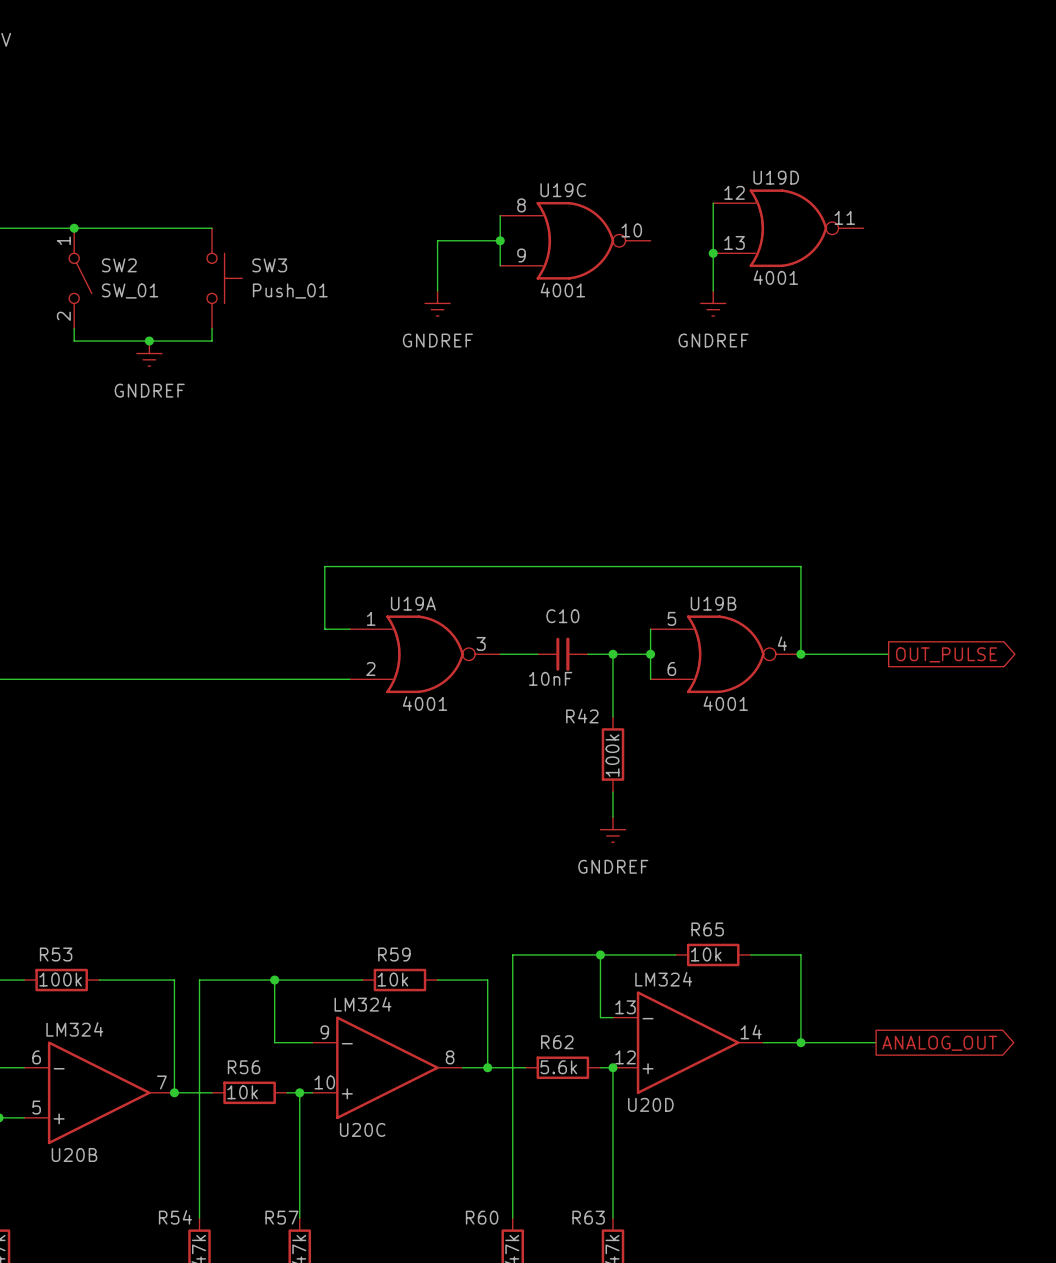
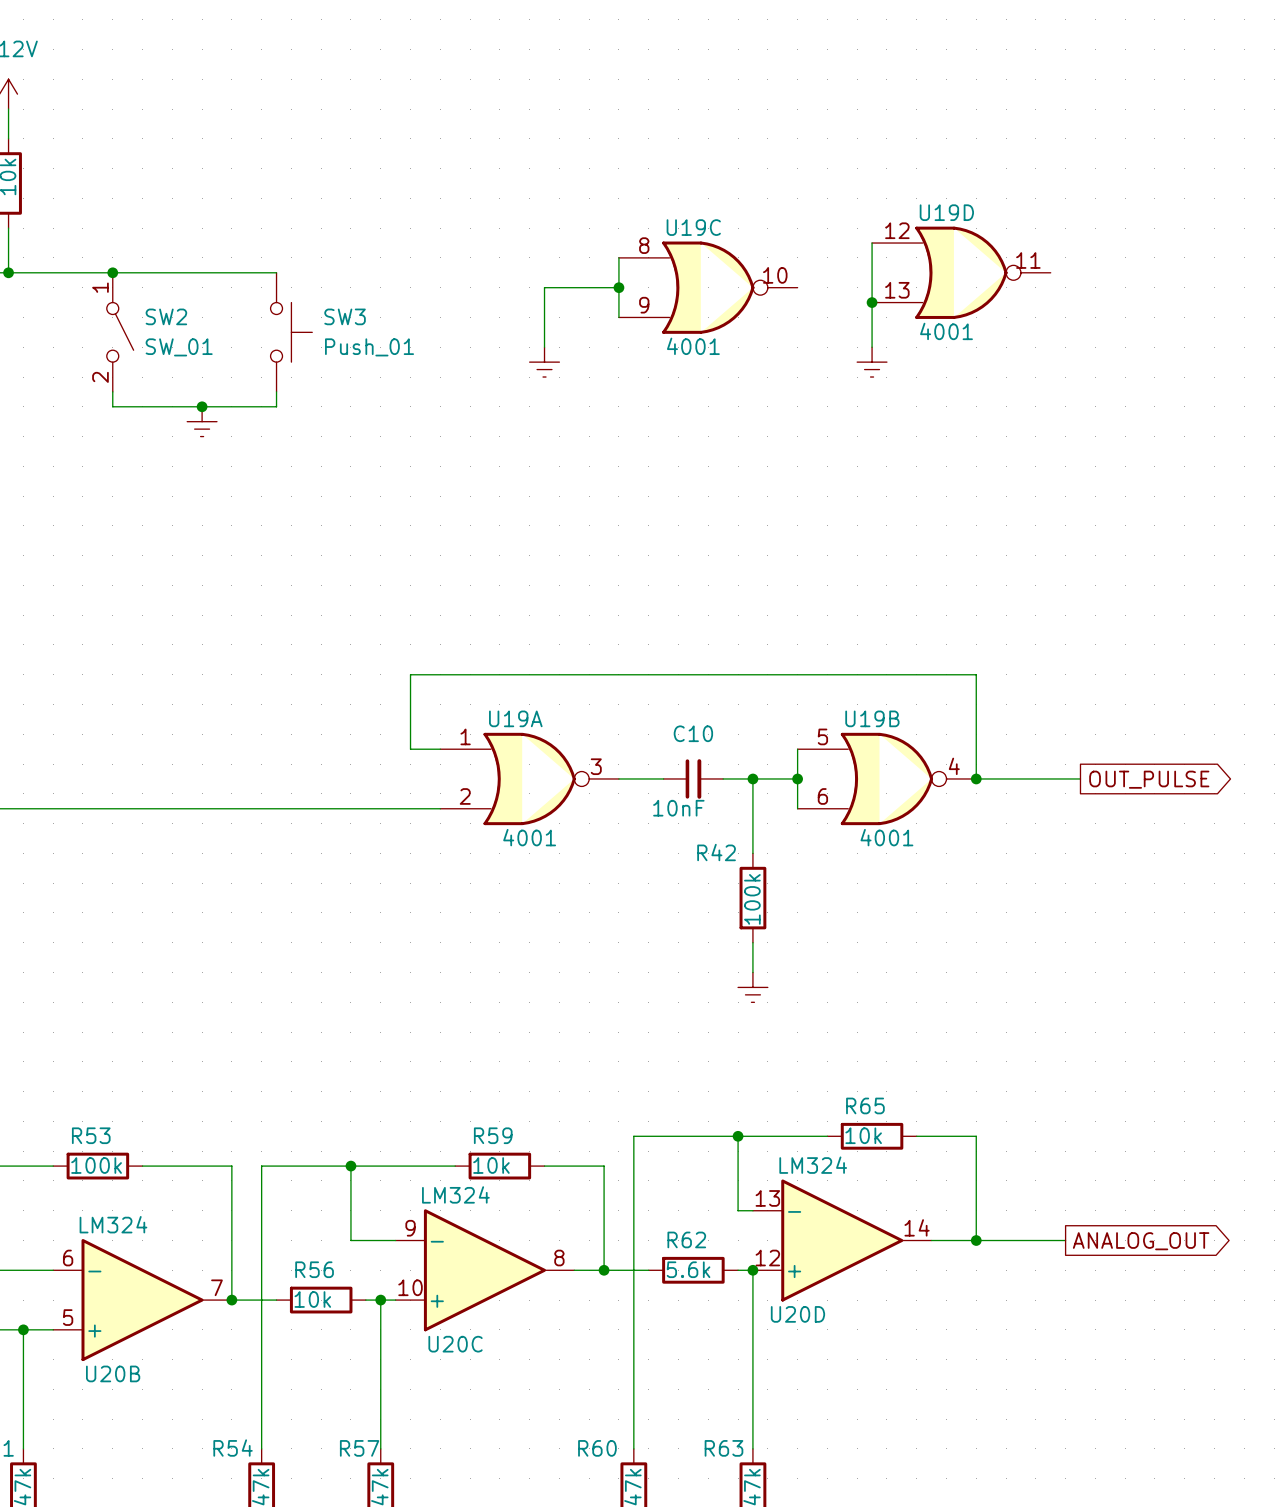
power symbol text: GNDREF (437, 340) -> none
power symbol text: GNDREF (713, 340) -> none
power symbol text: GNDREF (149, 390) -> none
power symbol text: GNDREF (613, 866) -> none

